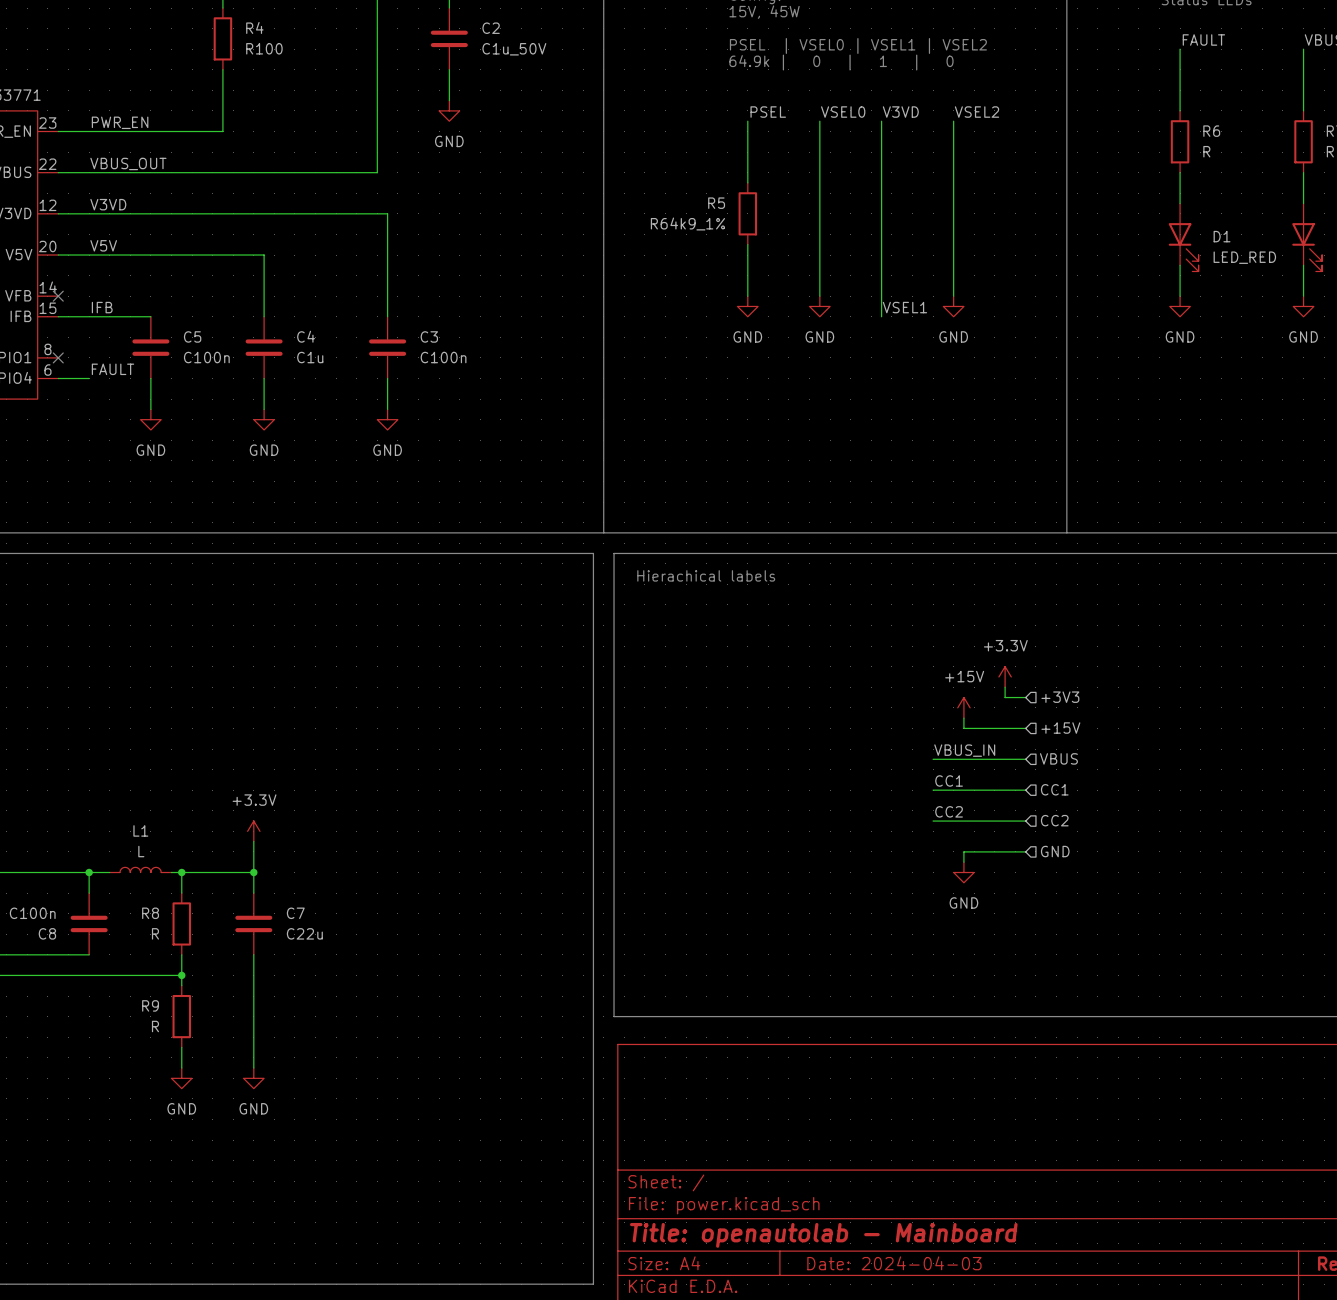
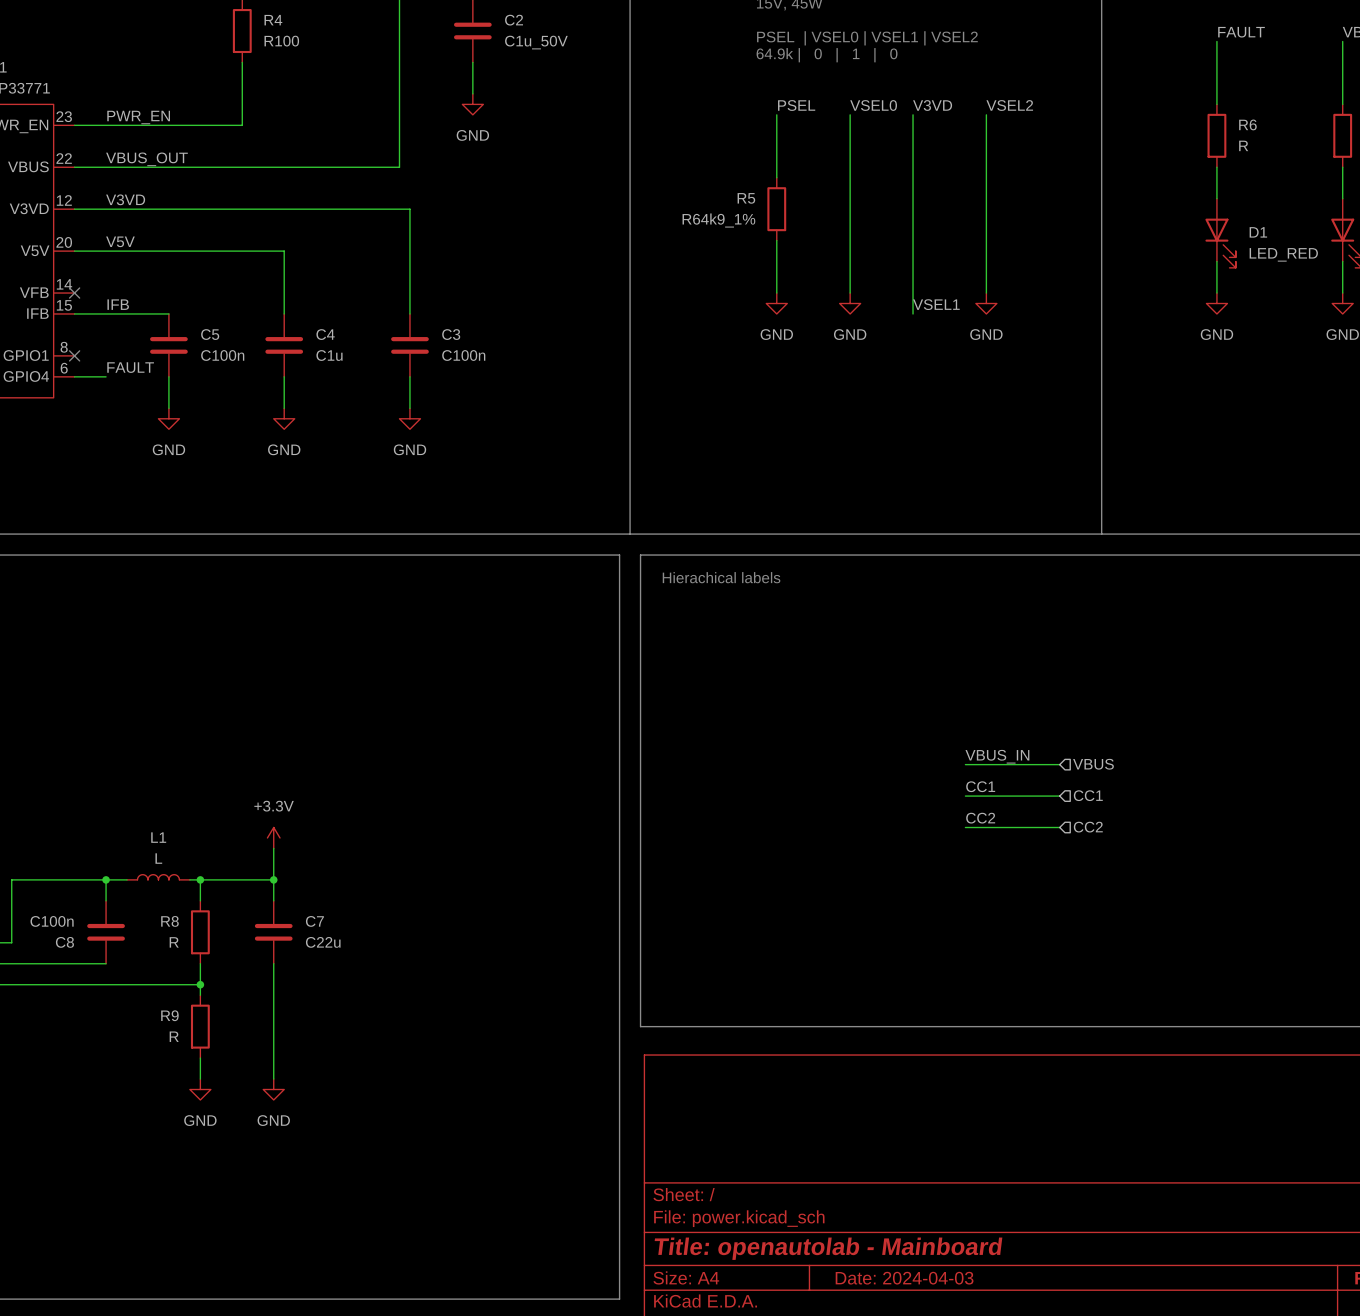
power symbol: +3.3V (1005, 676) -> none
wire: (1005, 687) (1005, 697) (1025, 697) -> none
hierarchical label: +3V3 (1060, 697) -> none
power symbol: +15V (963, 707) -> none
wire: (963, 718) (963, 728) (1025, 728) -> none
hierarchical label: +15V (1060, 728) -> none
wire: (1025, 851) (963, 851) (963, 862) -> none
hierarchical label: GND (1055, 851) -> none
power symbol: GND (963, 872) -> none

